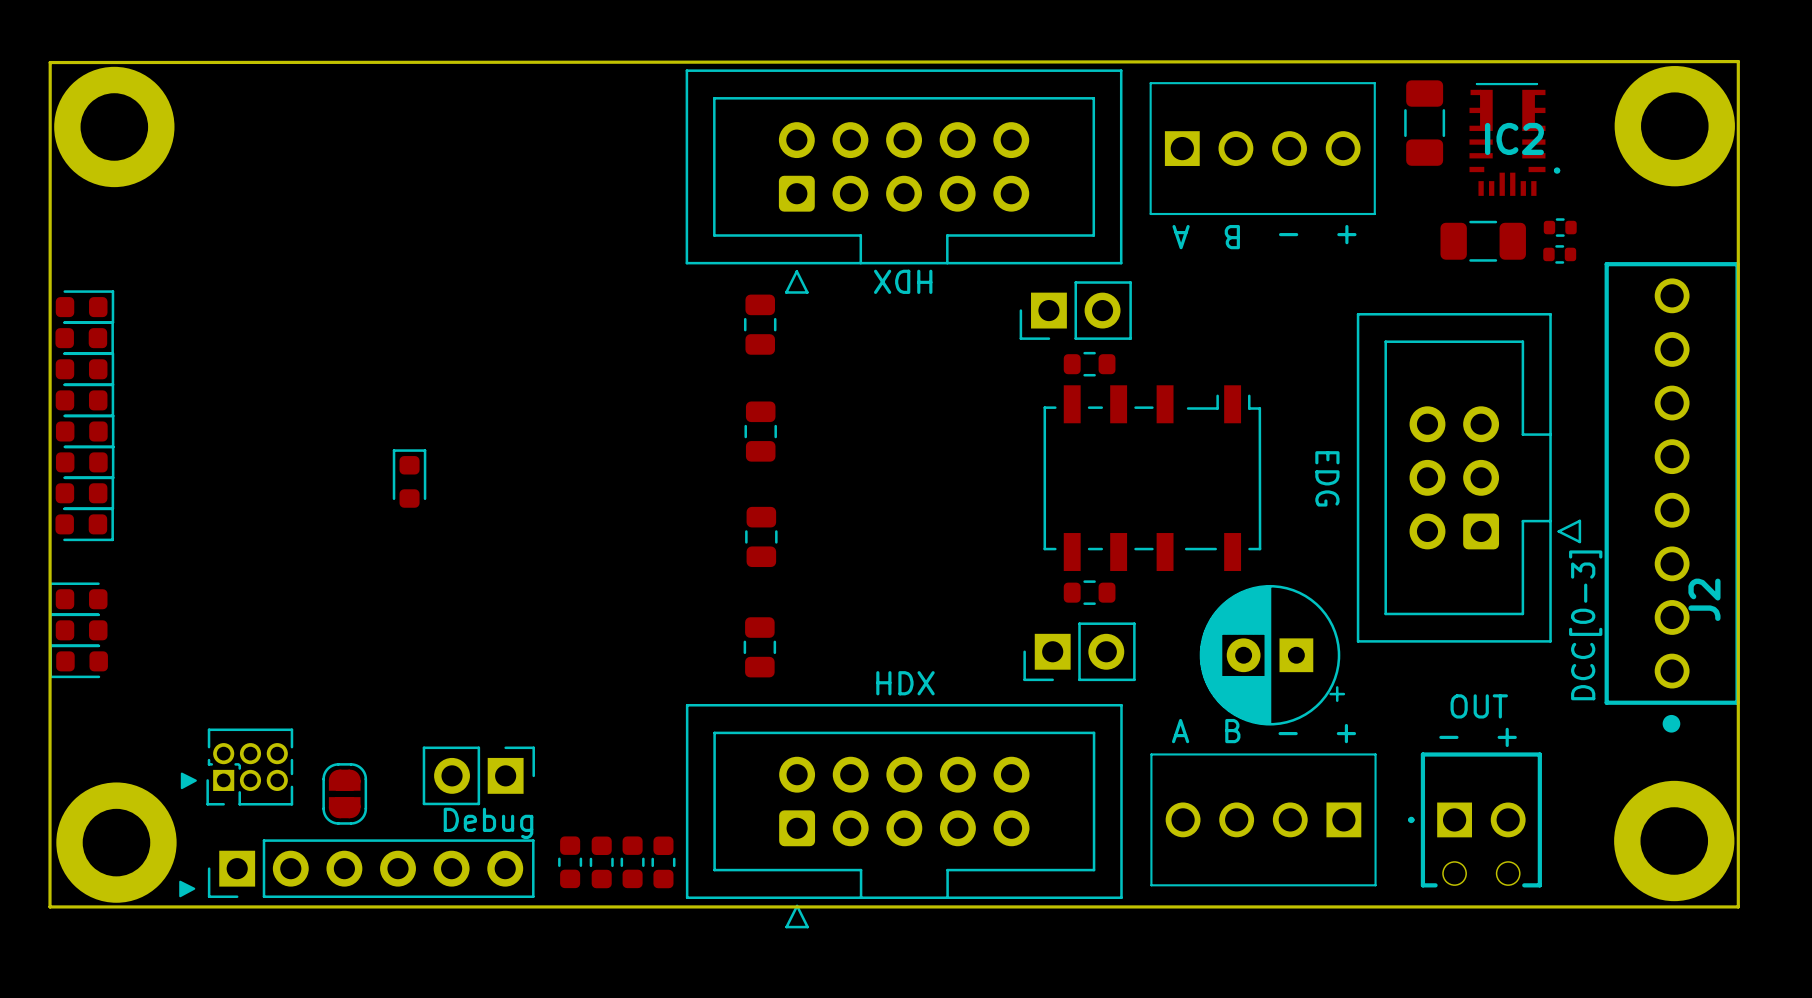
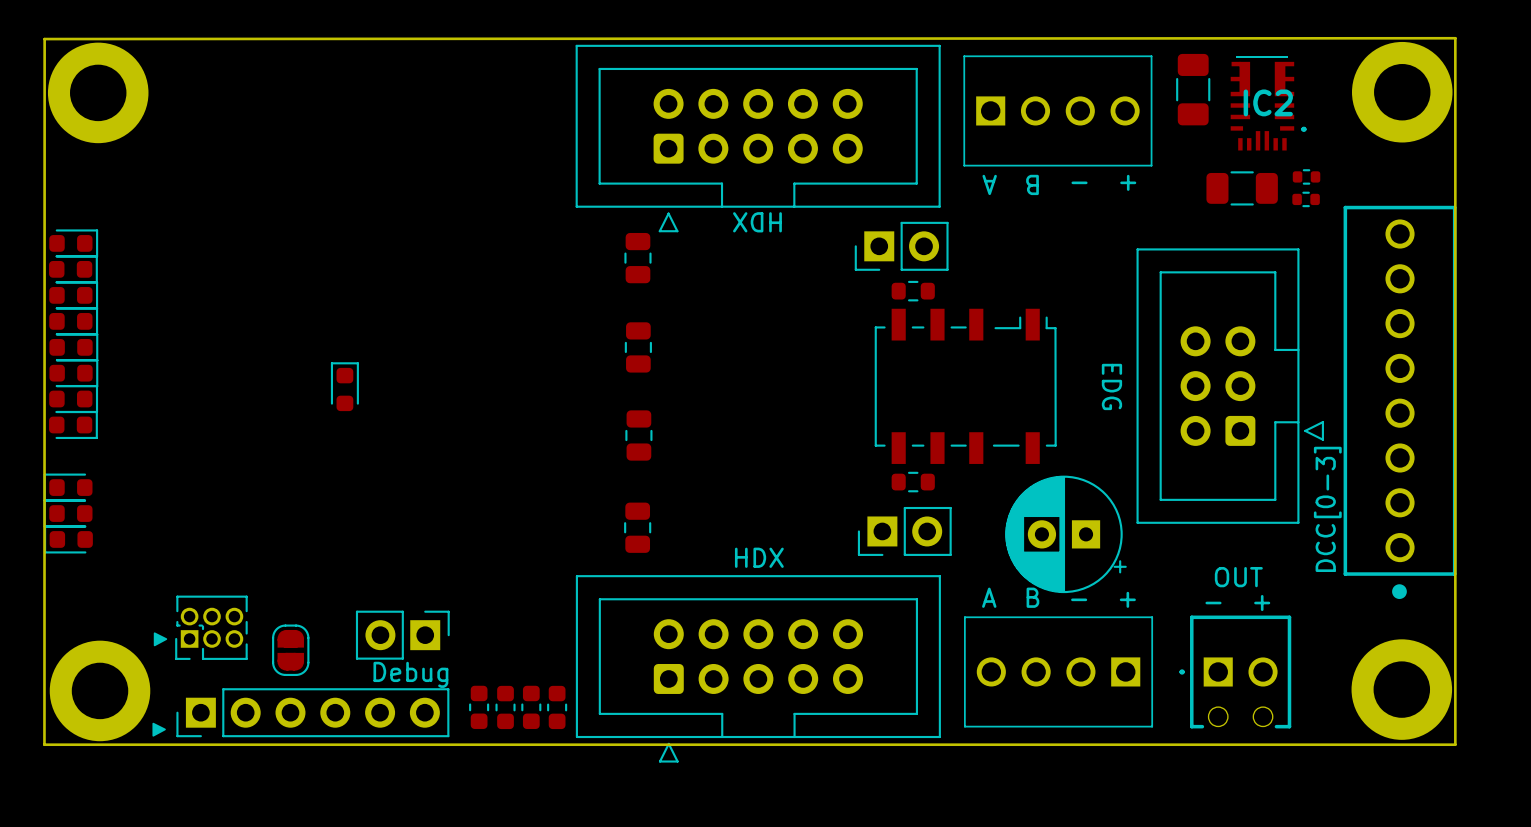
J2 name: J2 (1704, 599) -> none

